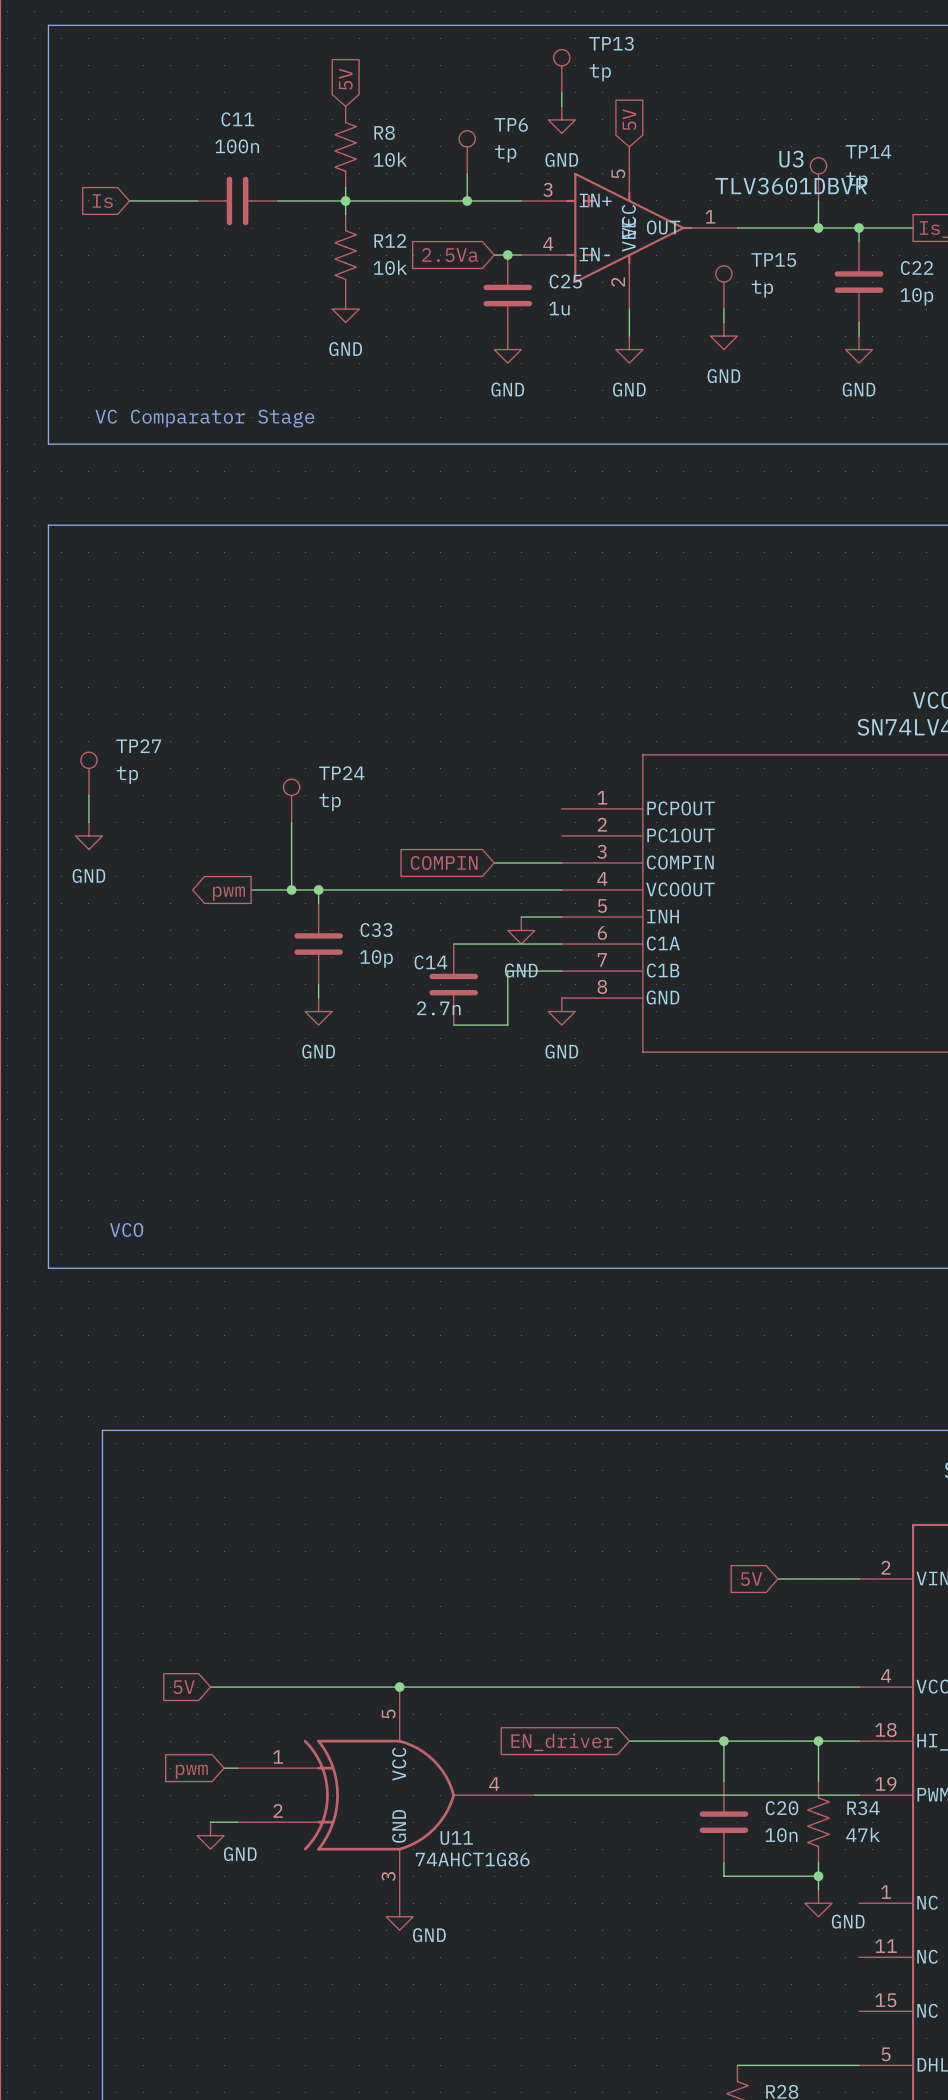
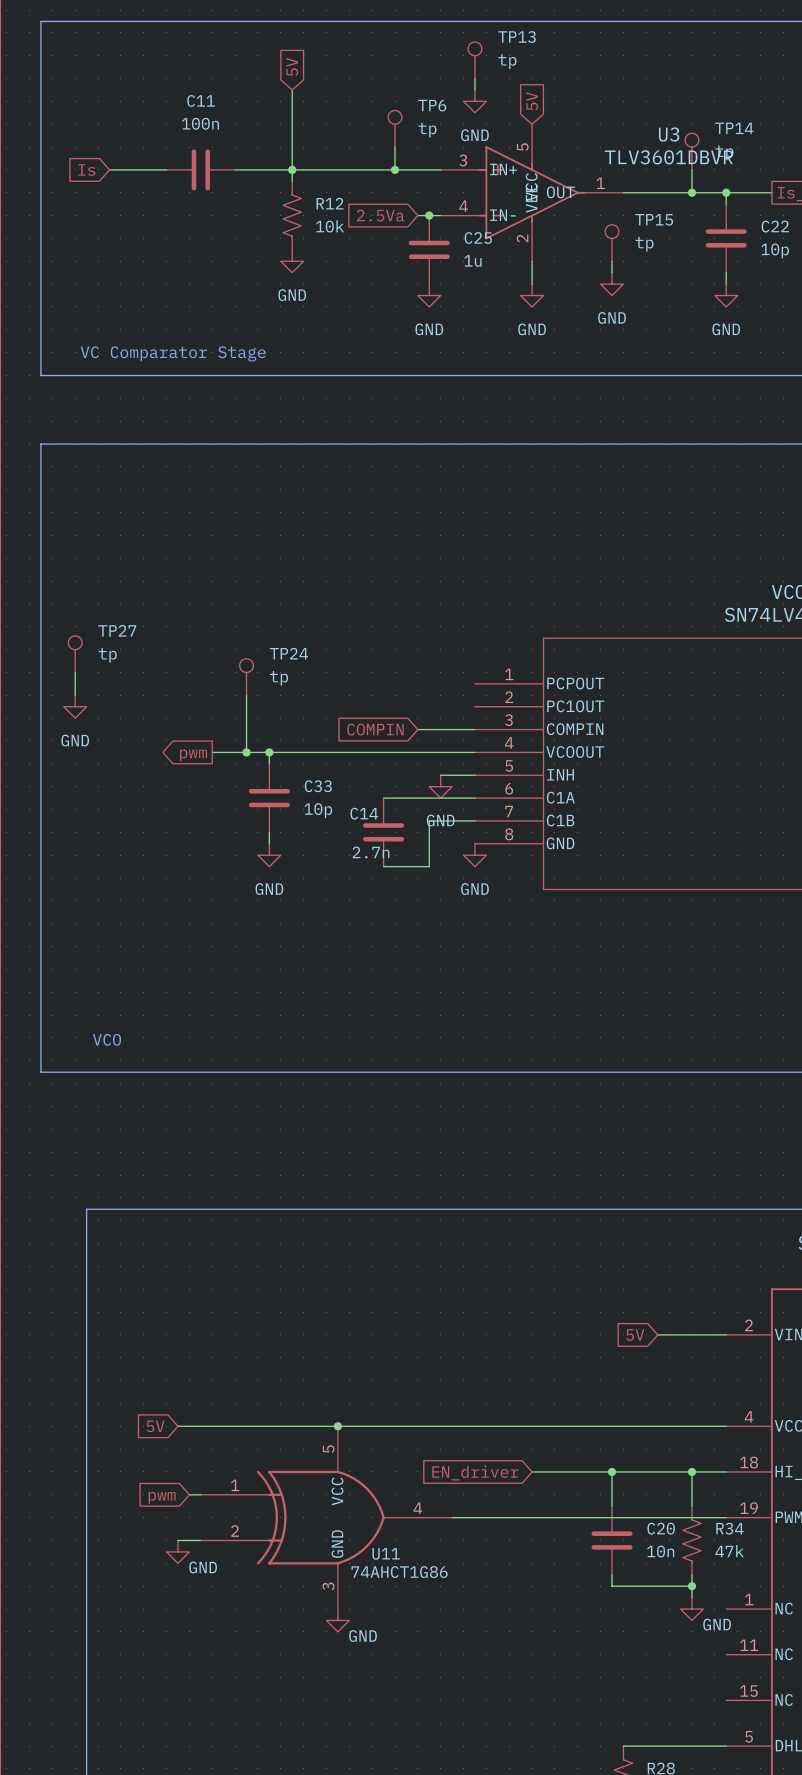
R8: 10k (345, 146) -> none

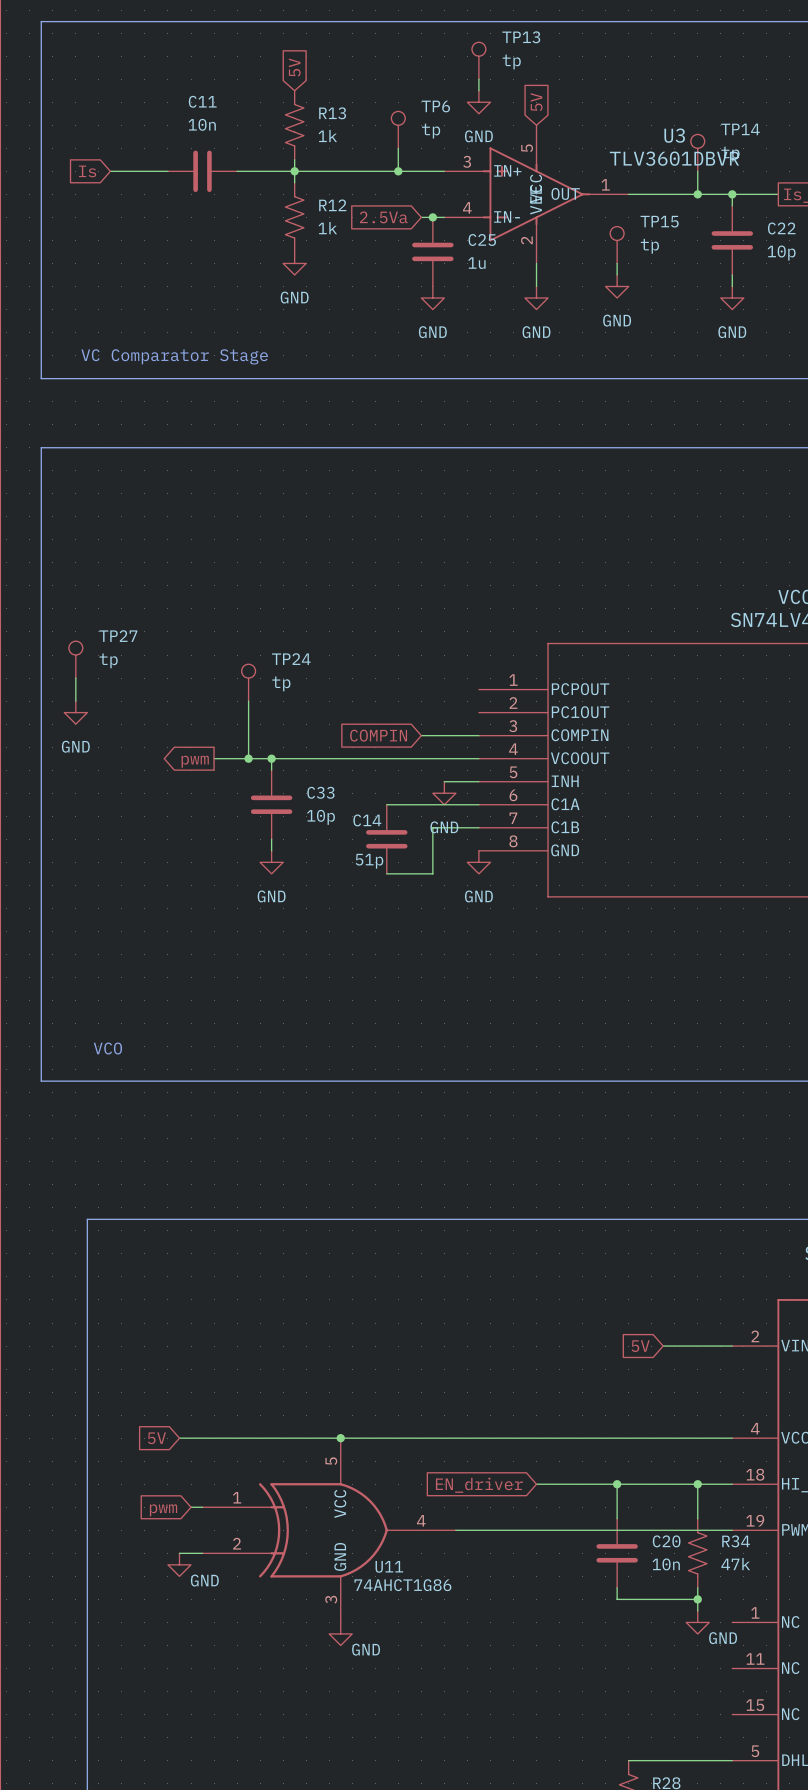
C11 value: 100n (200, 123) -> 10n (202, 124)
R13: none -> 1k (294, 125)
R12 value: 10k (330, 226) -> 1k (327, 228)
C14 value: 2.7n (371, 852) -> 51p (369, 861)

